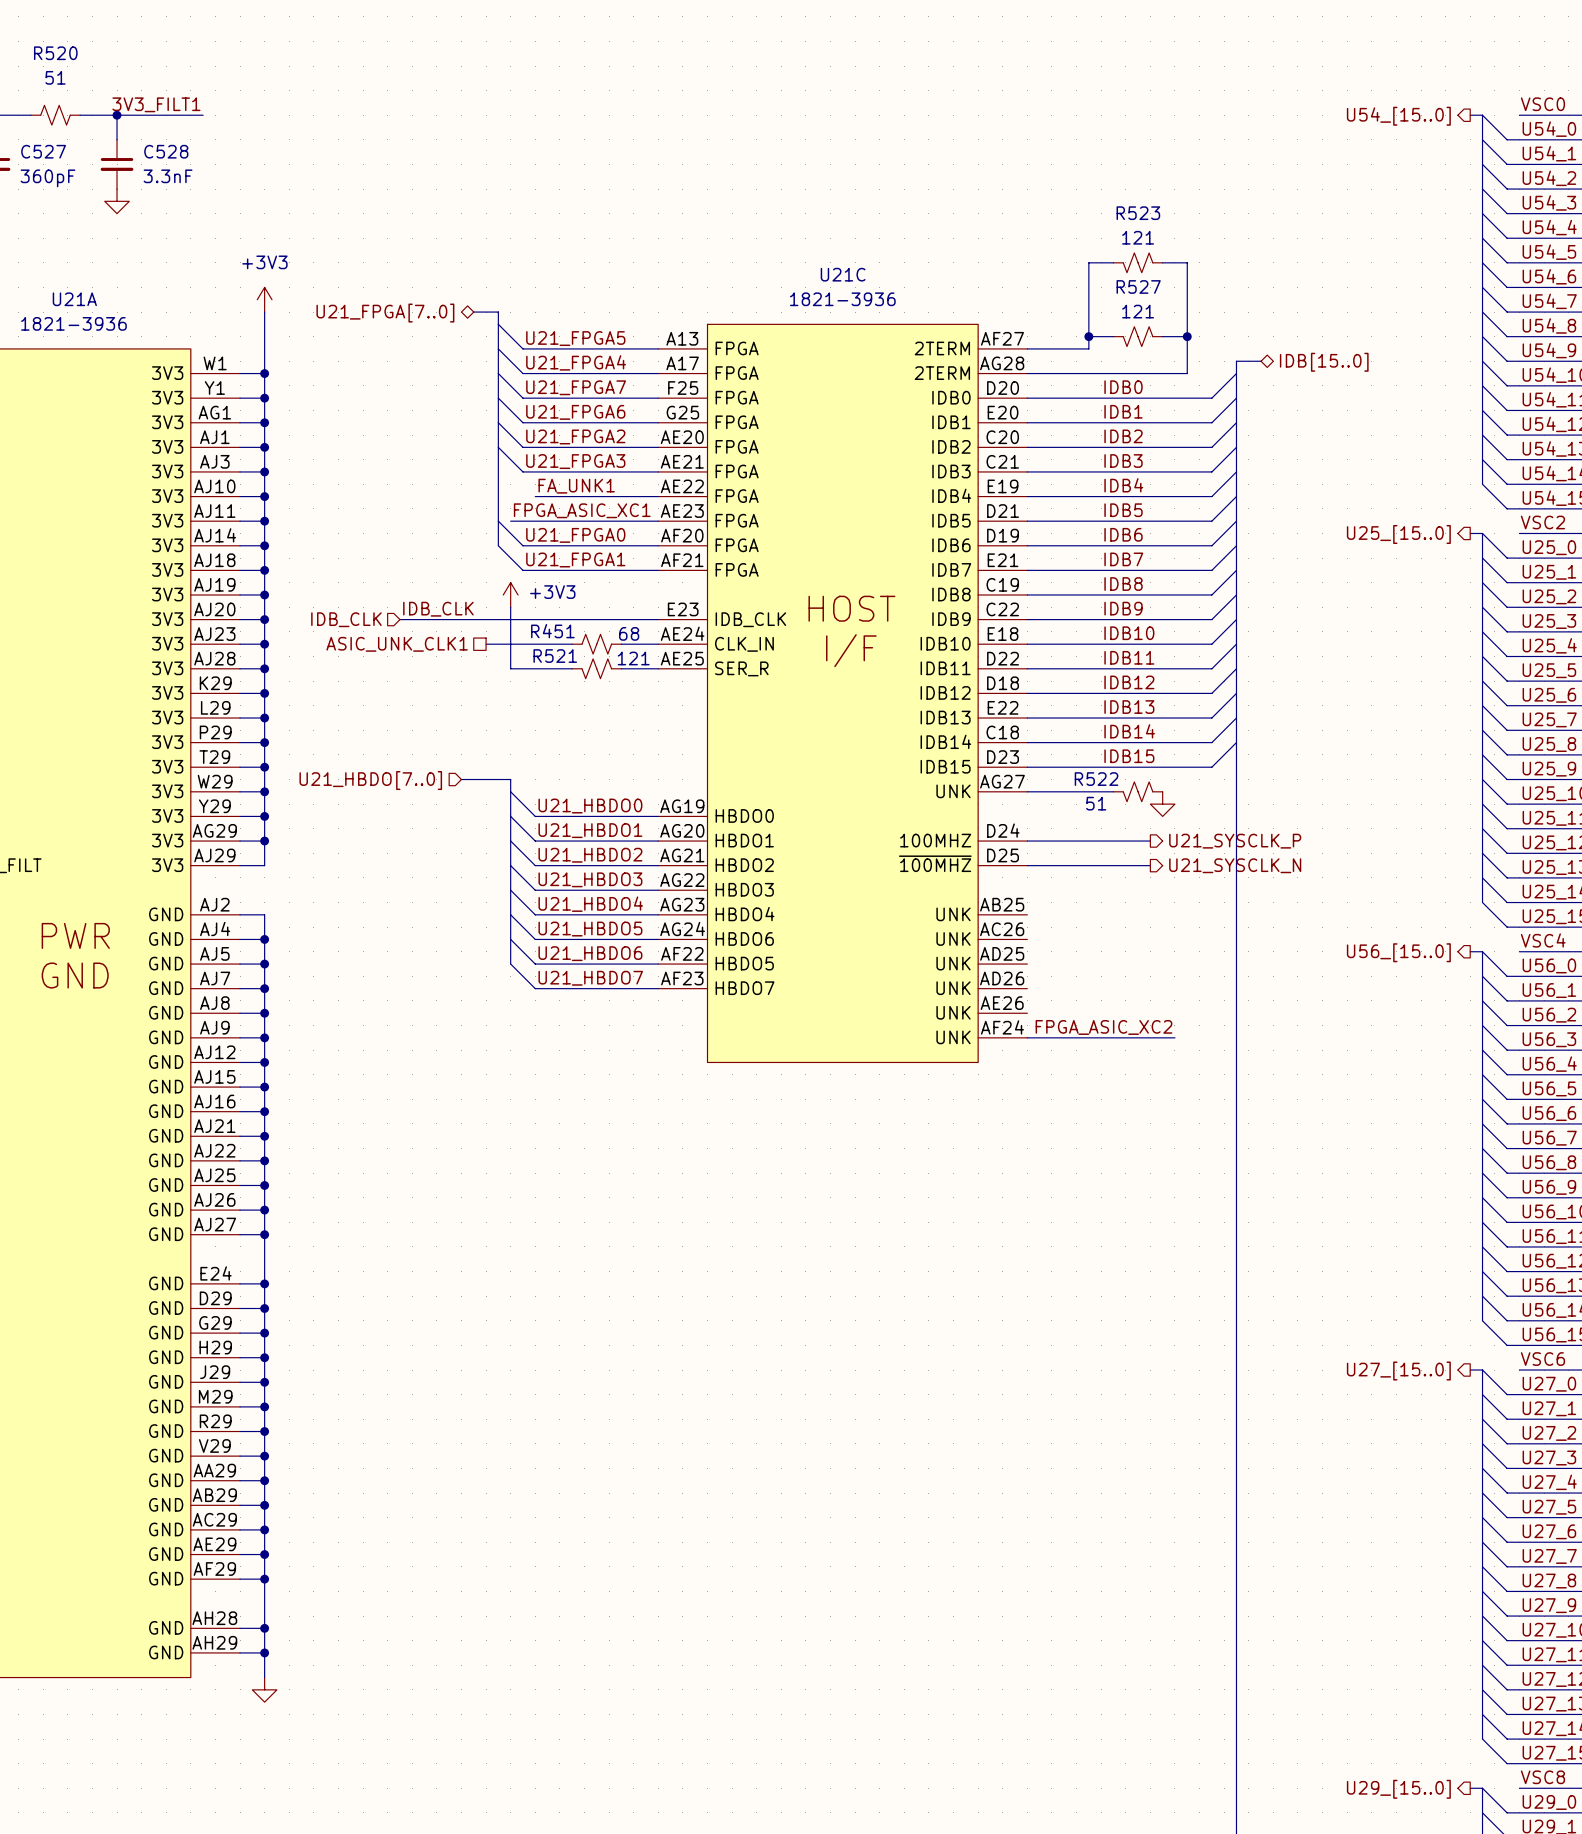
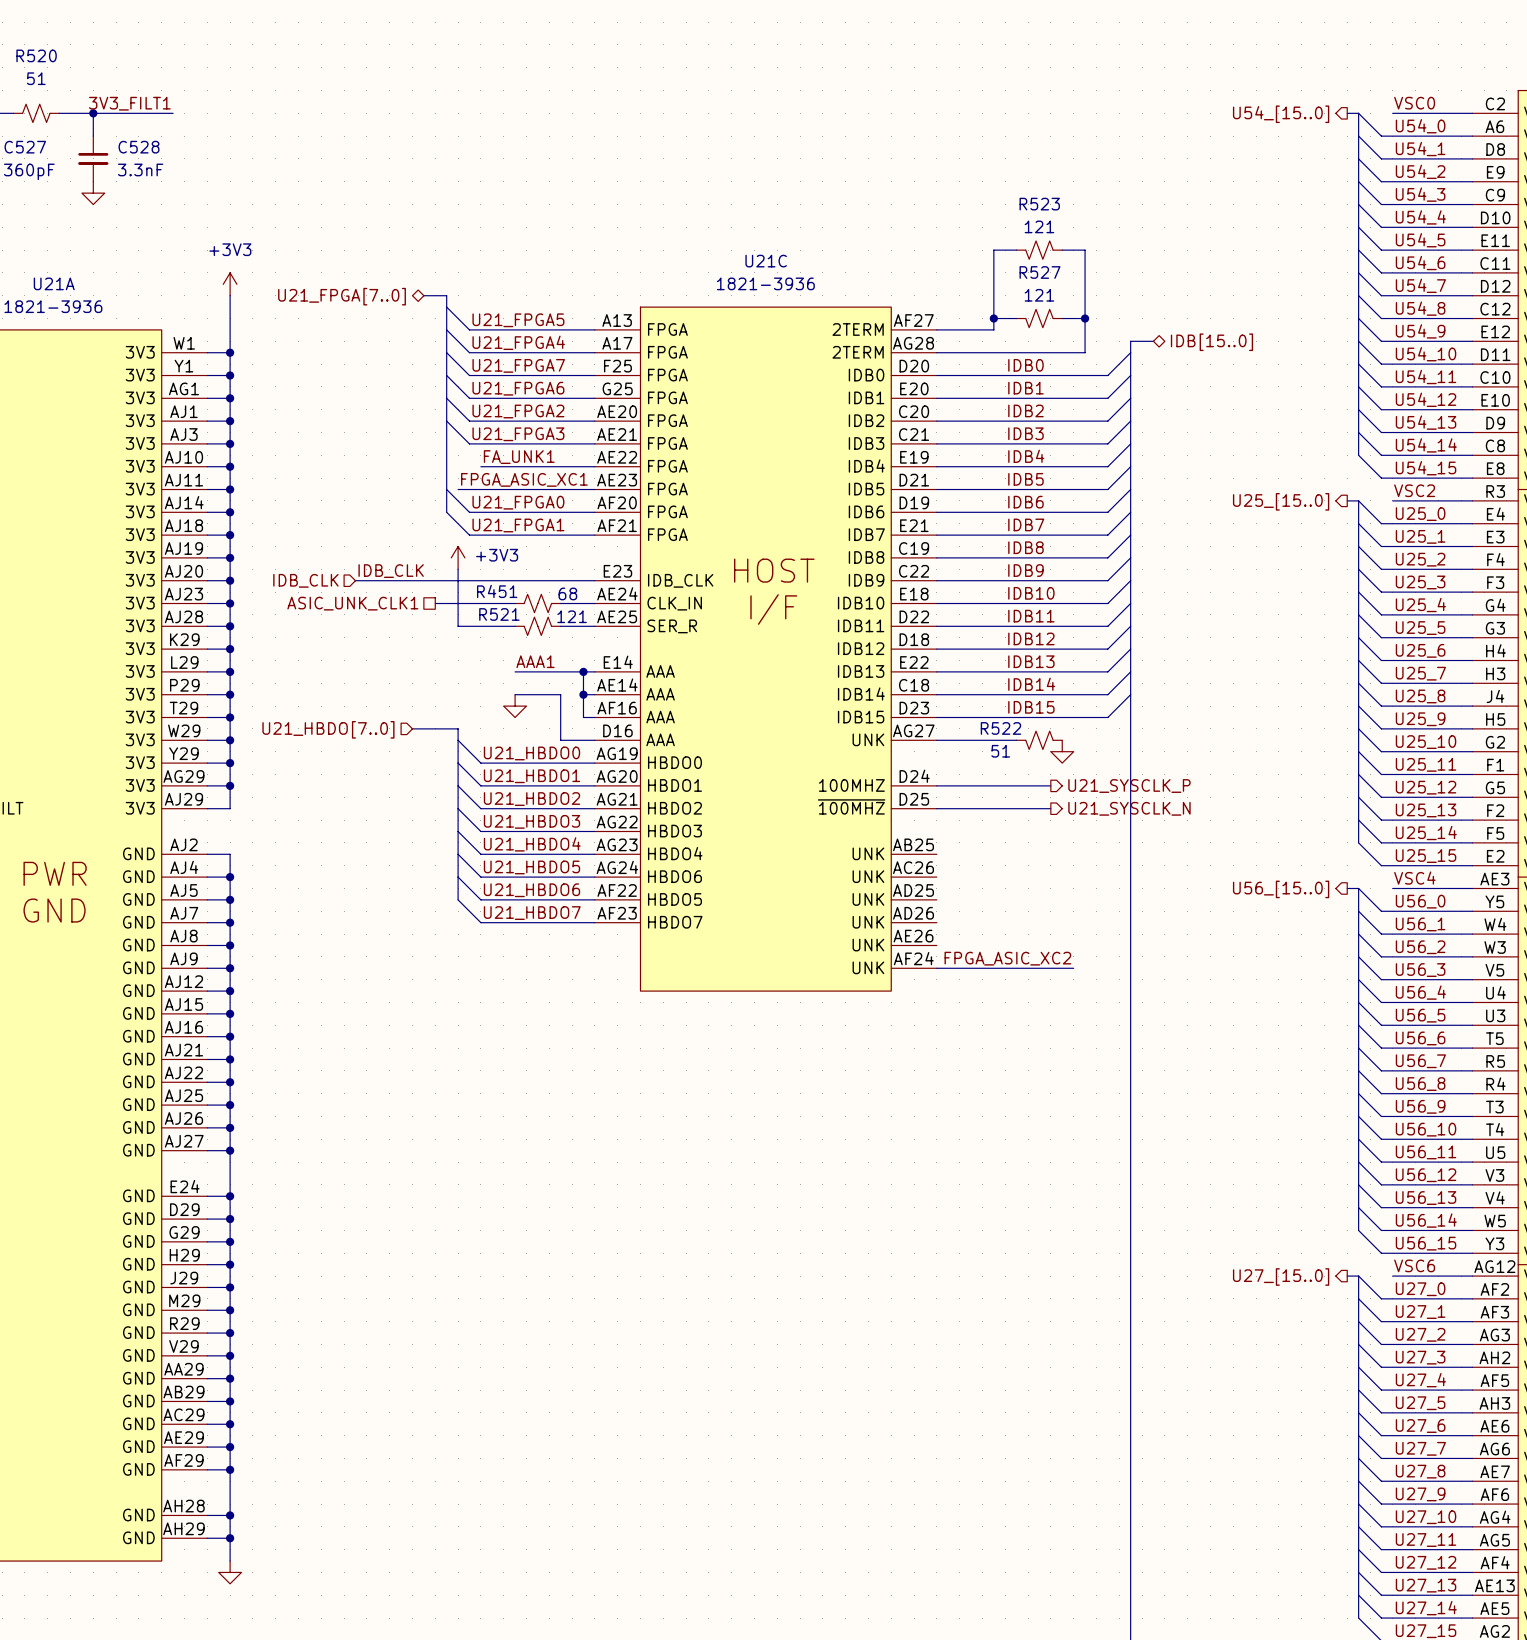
U21C symbol: [658, 324, 1028, 1063] -> [594, 307, 937, 992]
label: none -> AAA1 (535, 661)
wire: none -> (515, 671) (594, 671)
wire: none -> (583, 671) (583, 717) (594, 717)
junction: none -> (583, 671)
wire: none -> (515, 694) (560, 694) (560, 740) (594, 740)
wire: none -> (583, 694) (594, 694)
junction: none -> (583, 694)
power symbol: none -> (515, 706)

